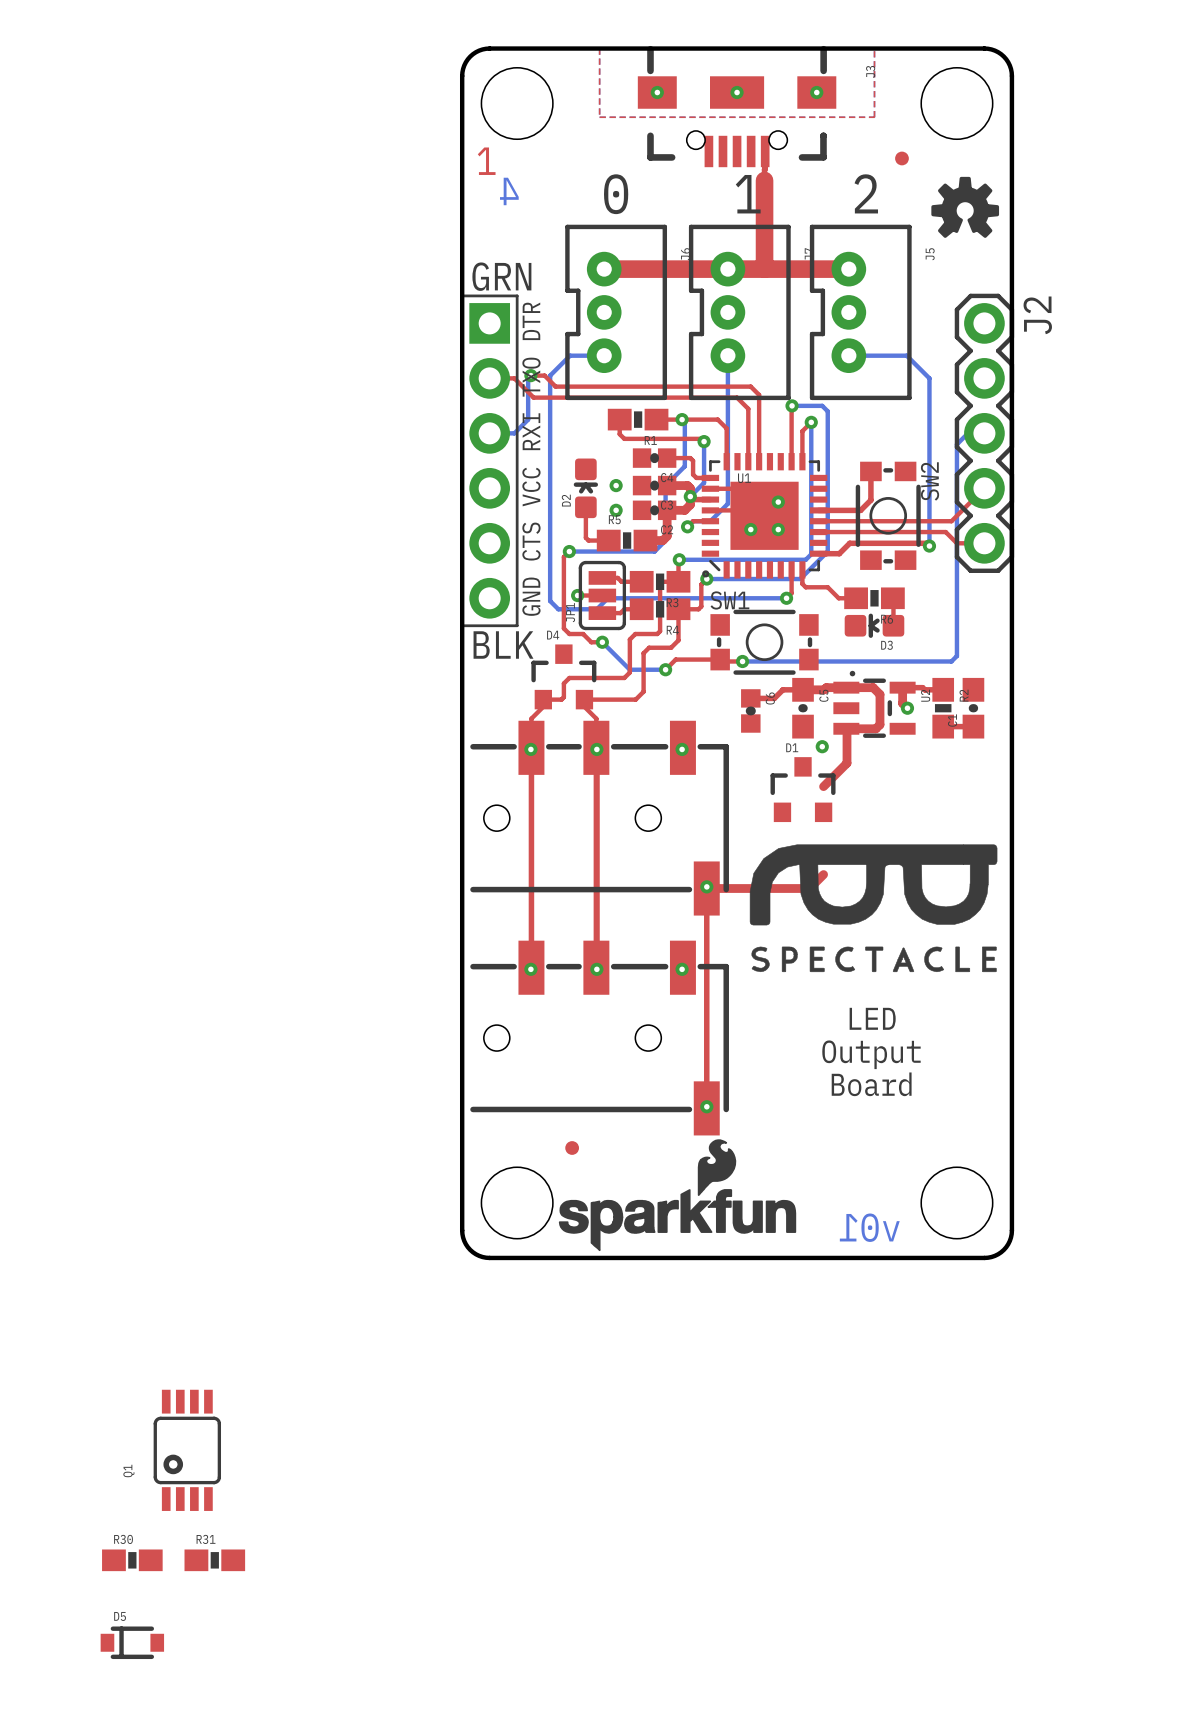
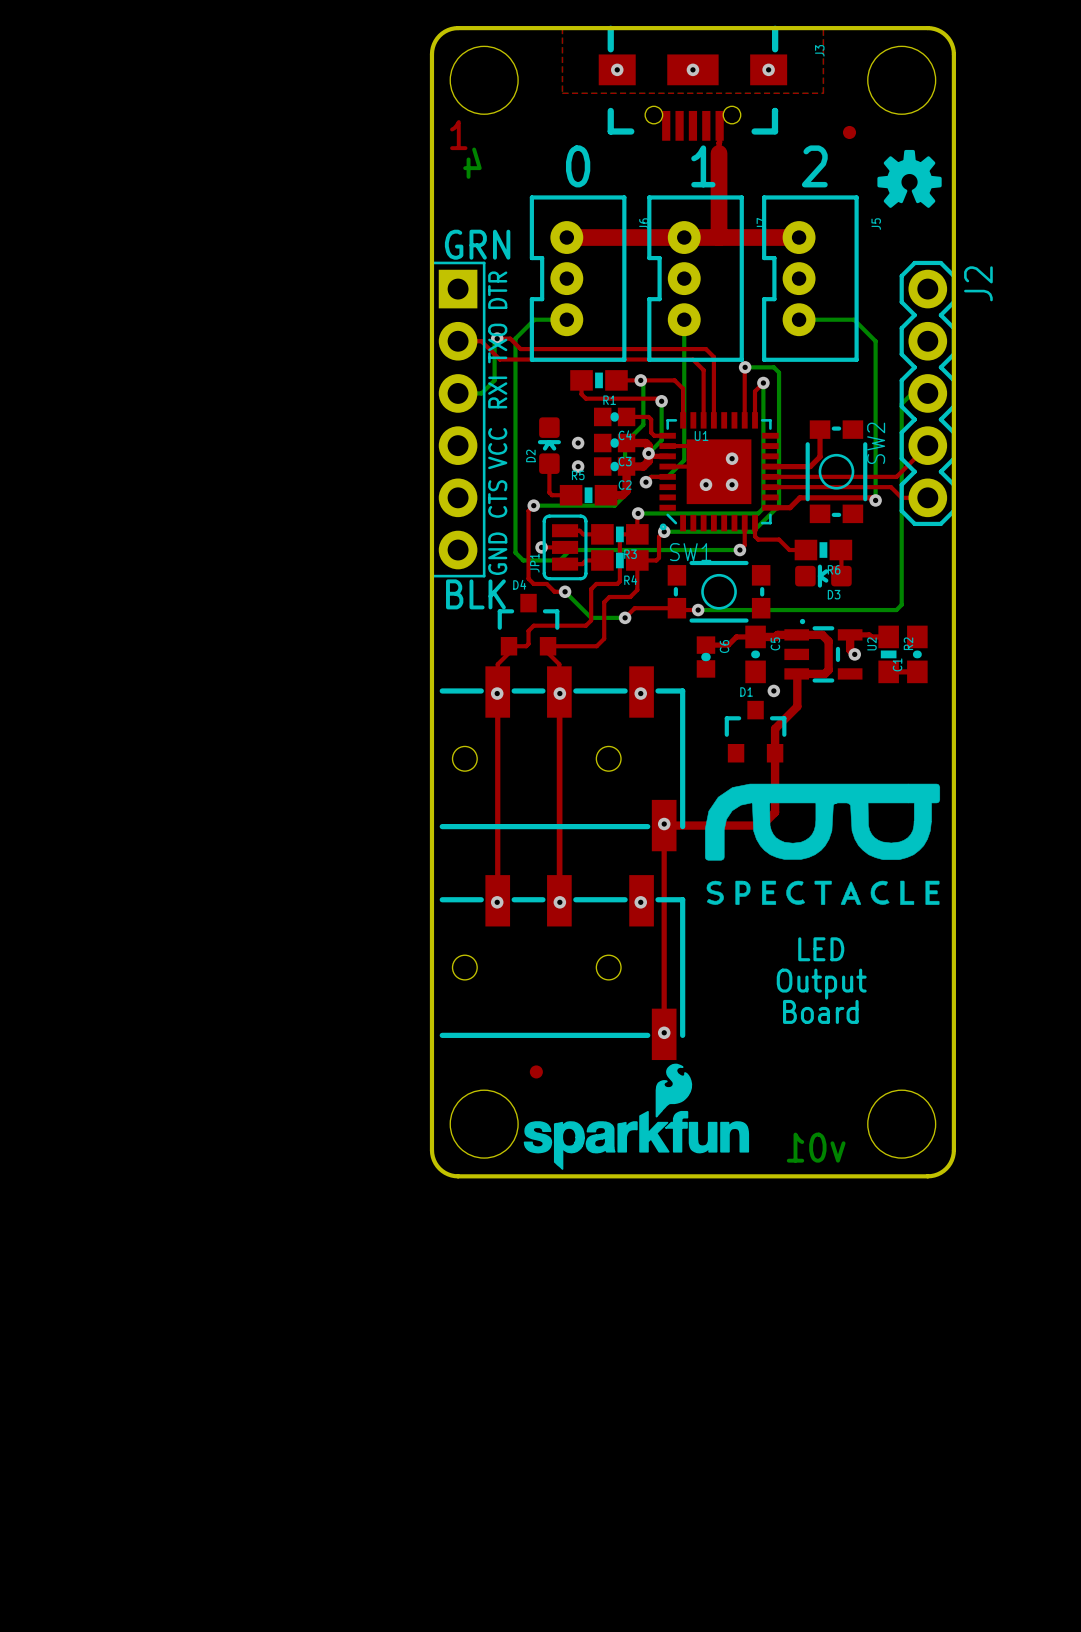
top track: none -> (775, 728) (775, 812)
Q1: (187, 1450) -> none
R30: (132, 1560) -> none
R31: (214, 1560) -> none
D5: (132, 1642) -> none

